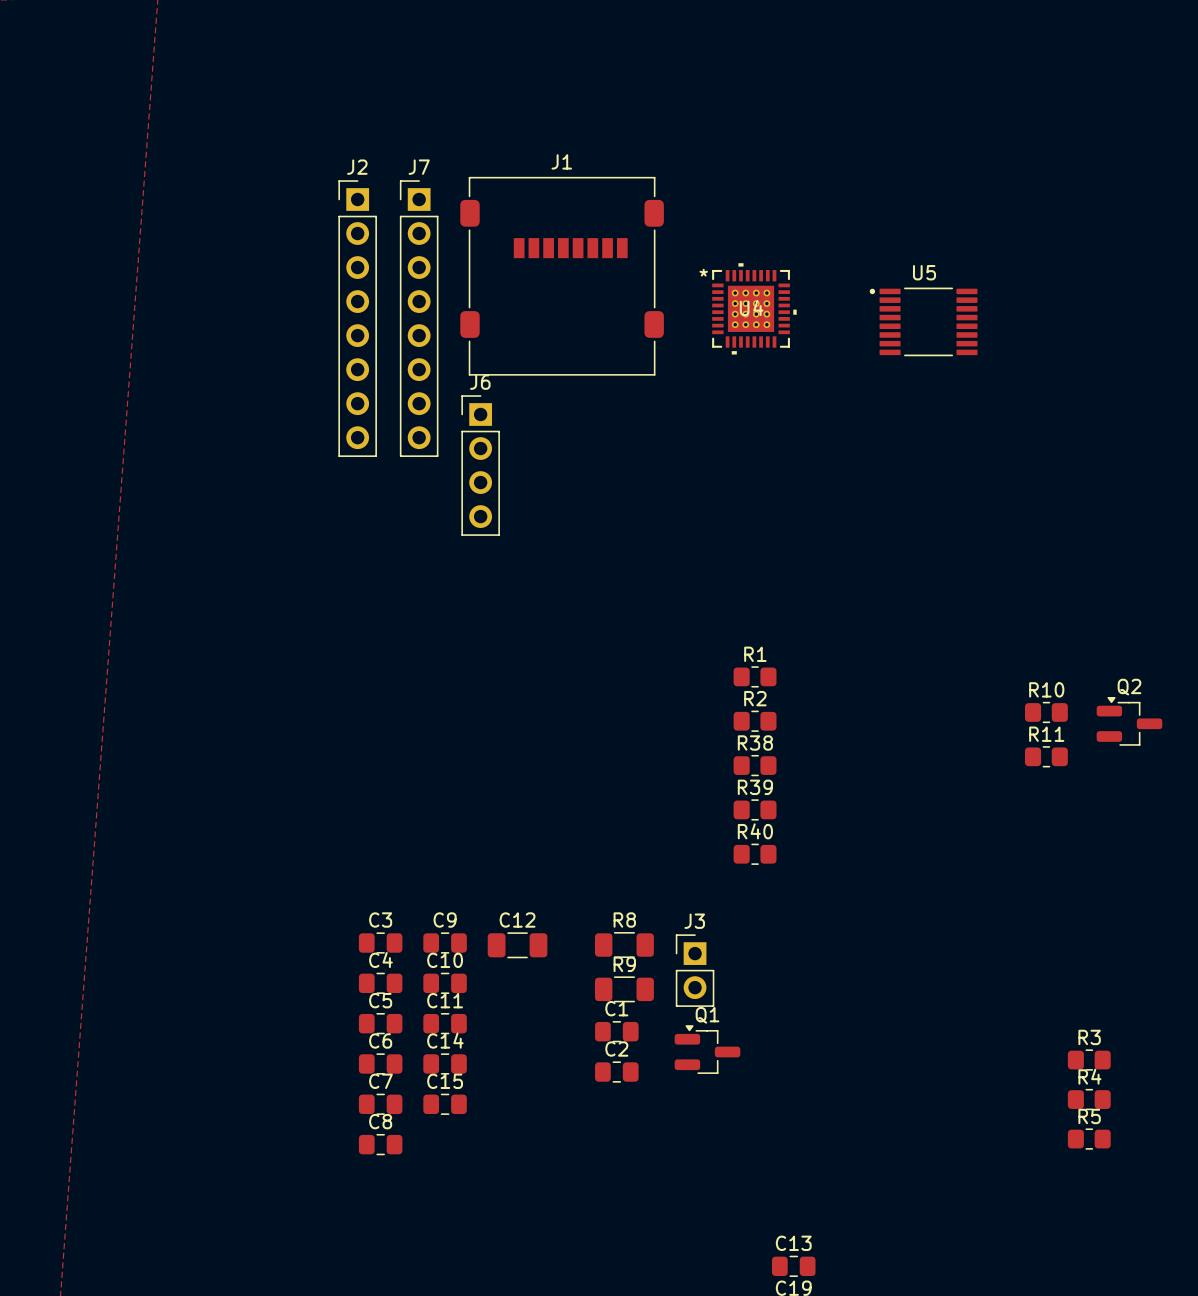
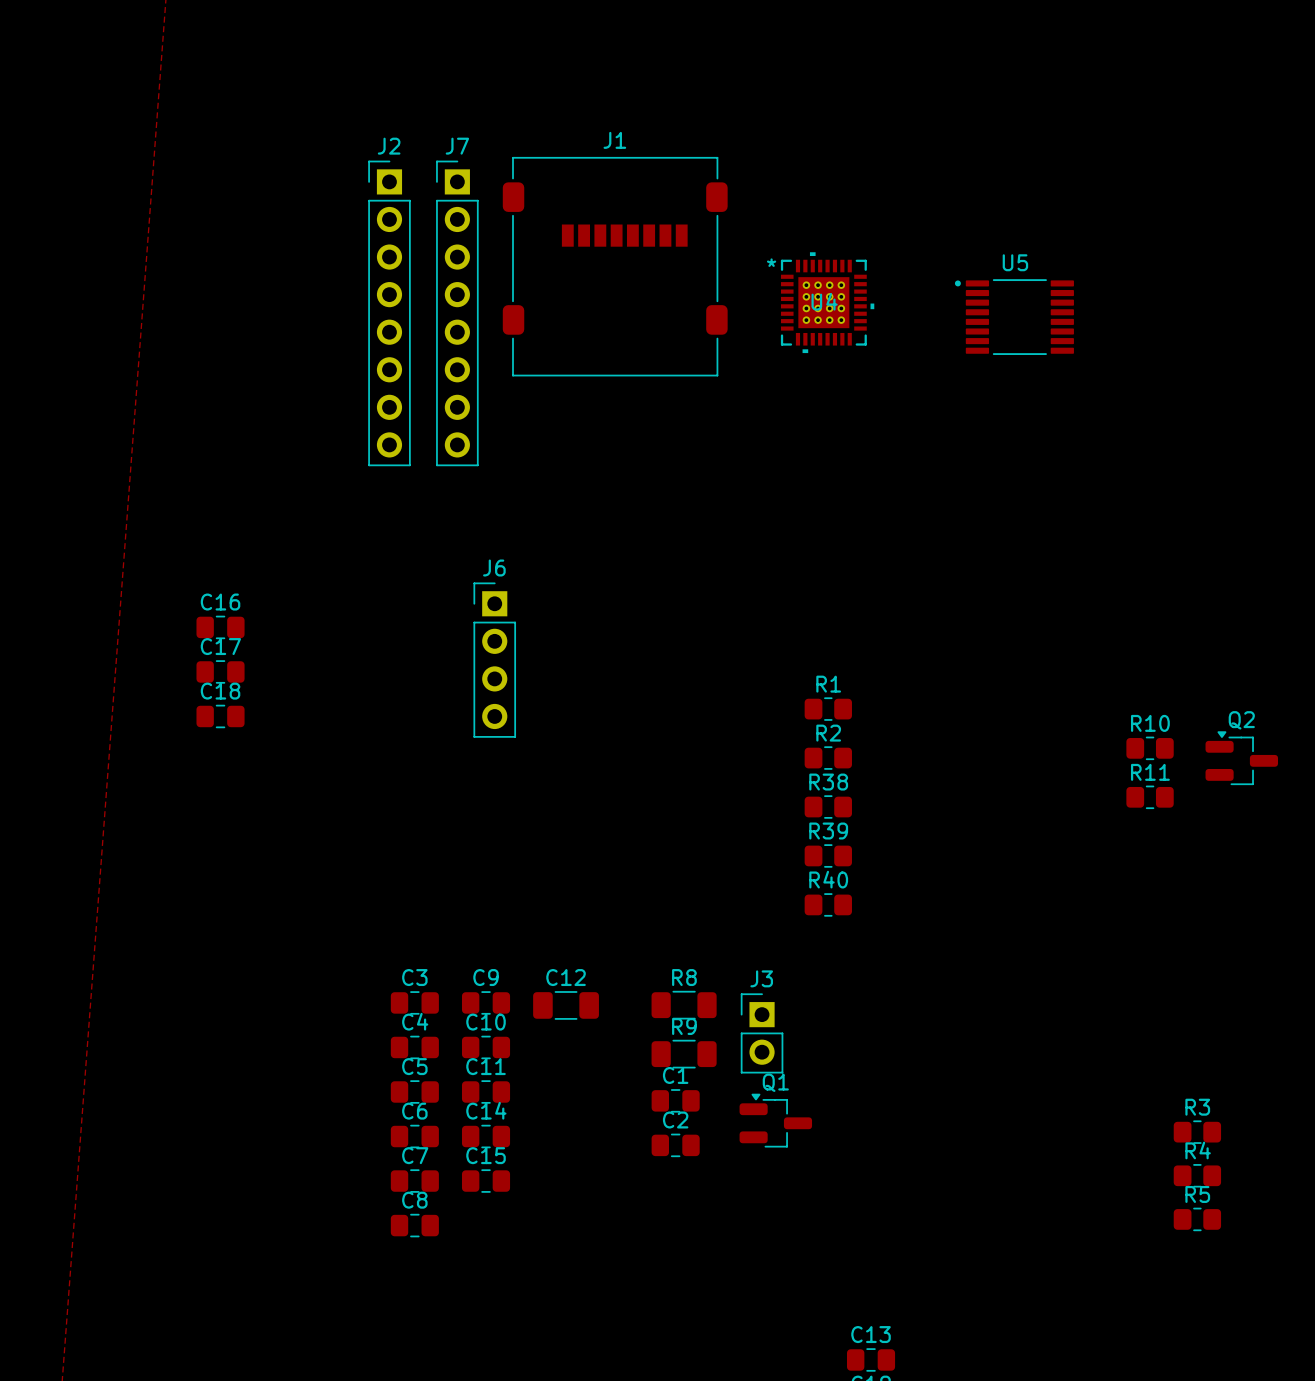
J6 position: (480, 465) -> (494, 660)
C16: none -> (220, 627)
C17: none -> (220, 671)
C18: none -> (220, 716)

